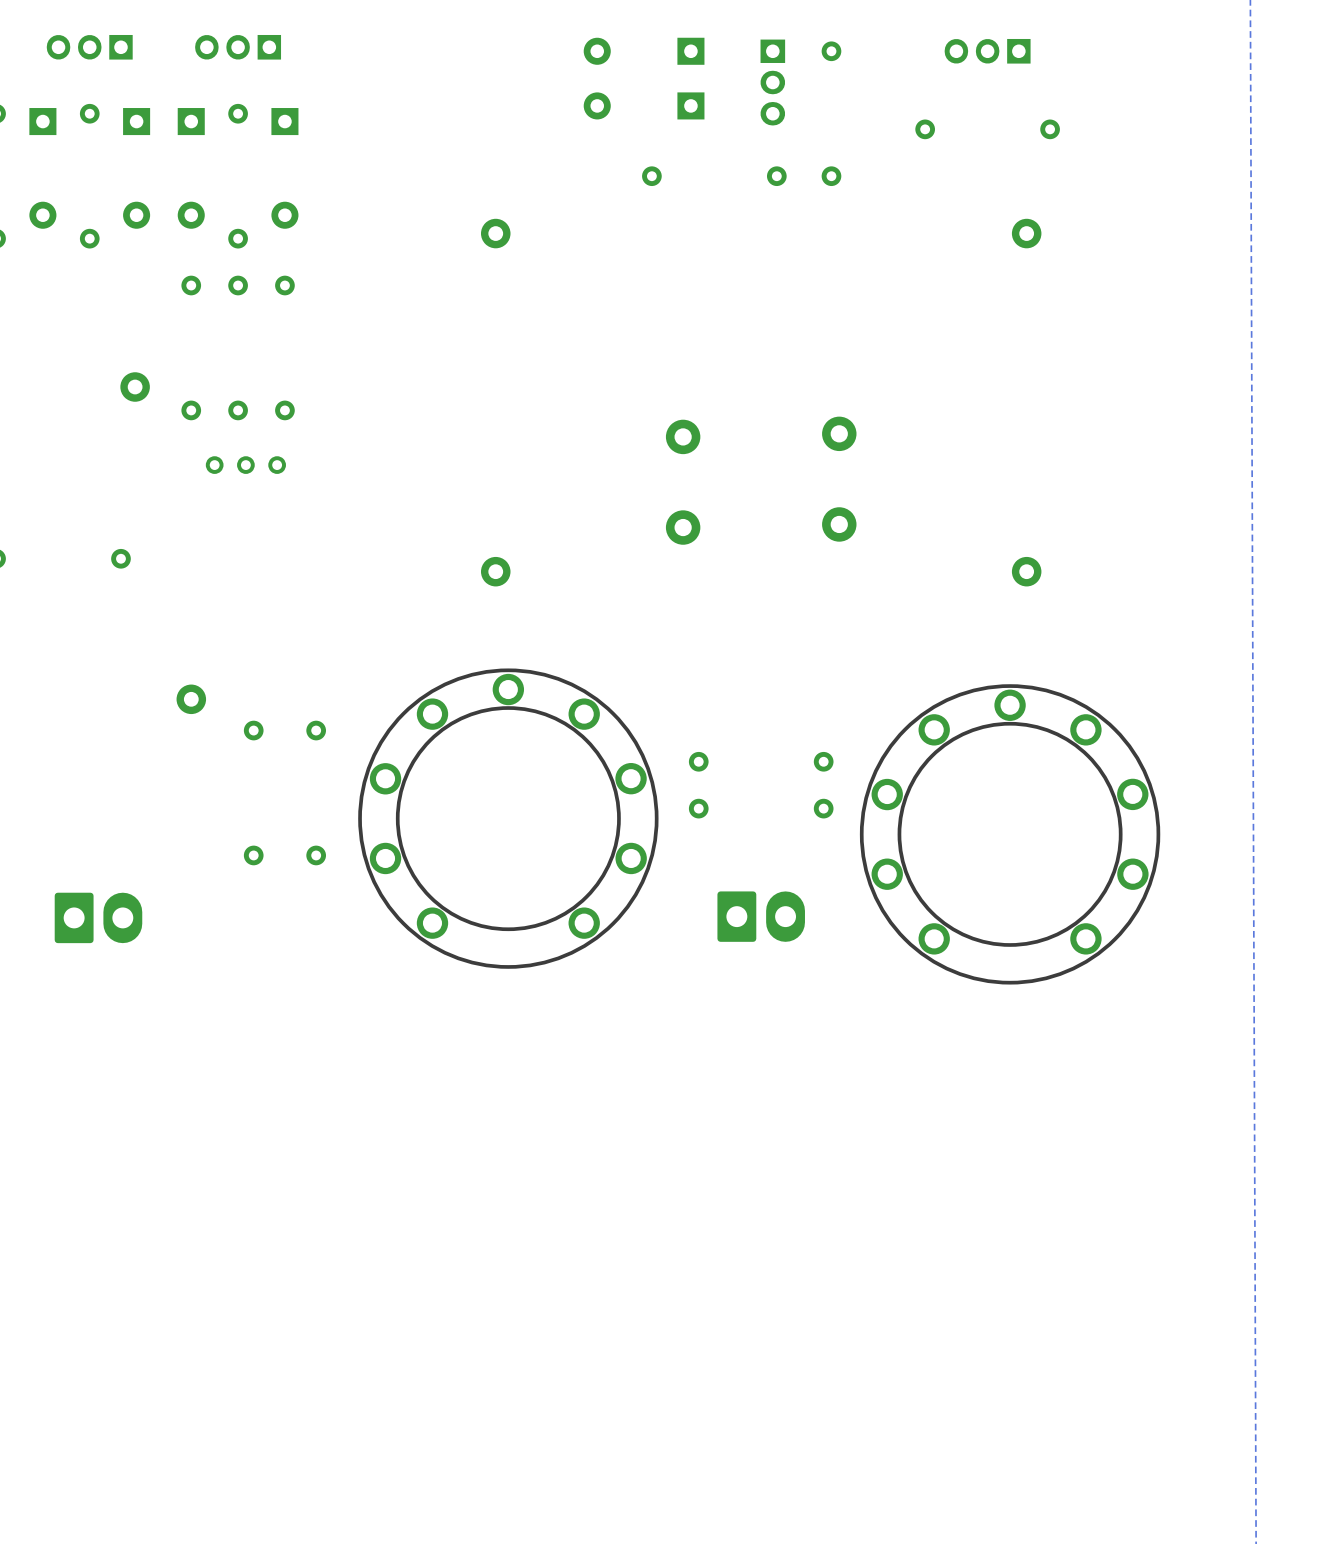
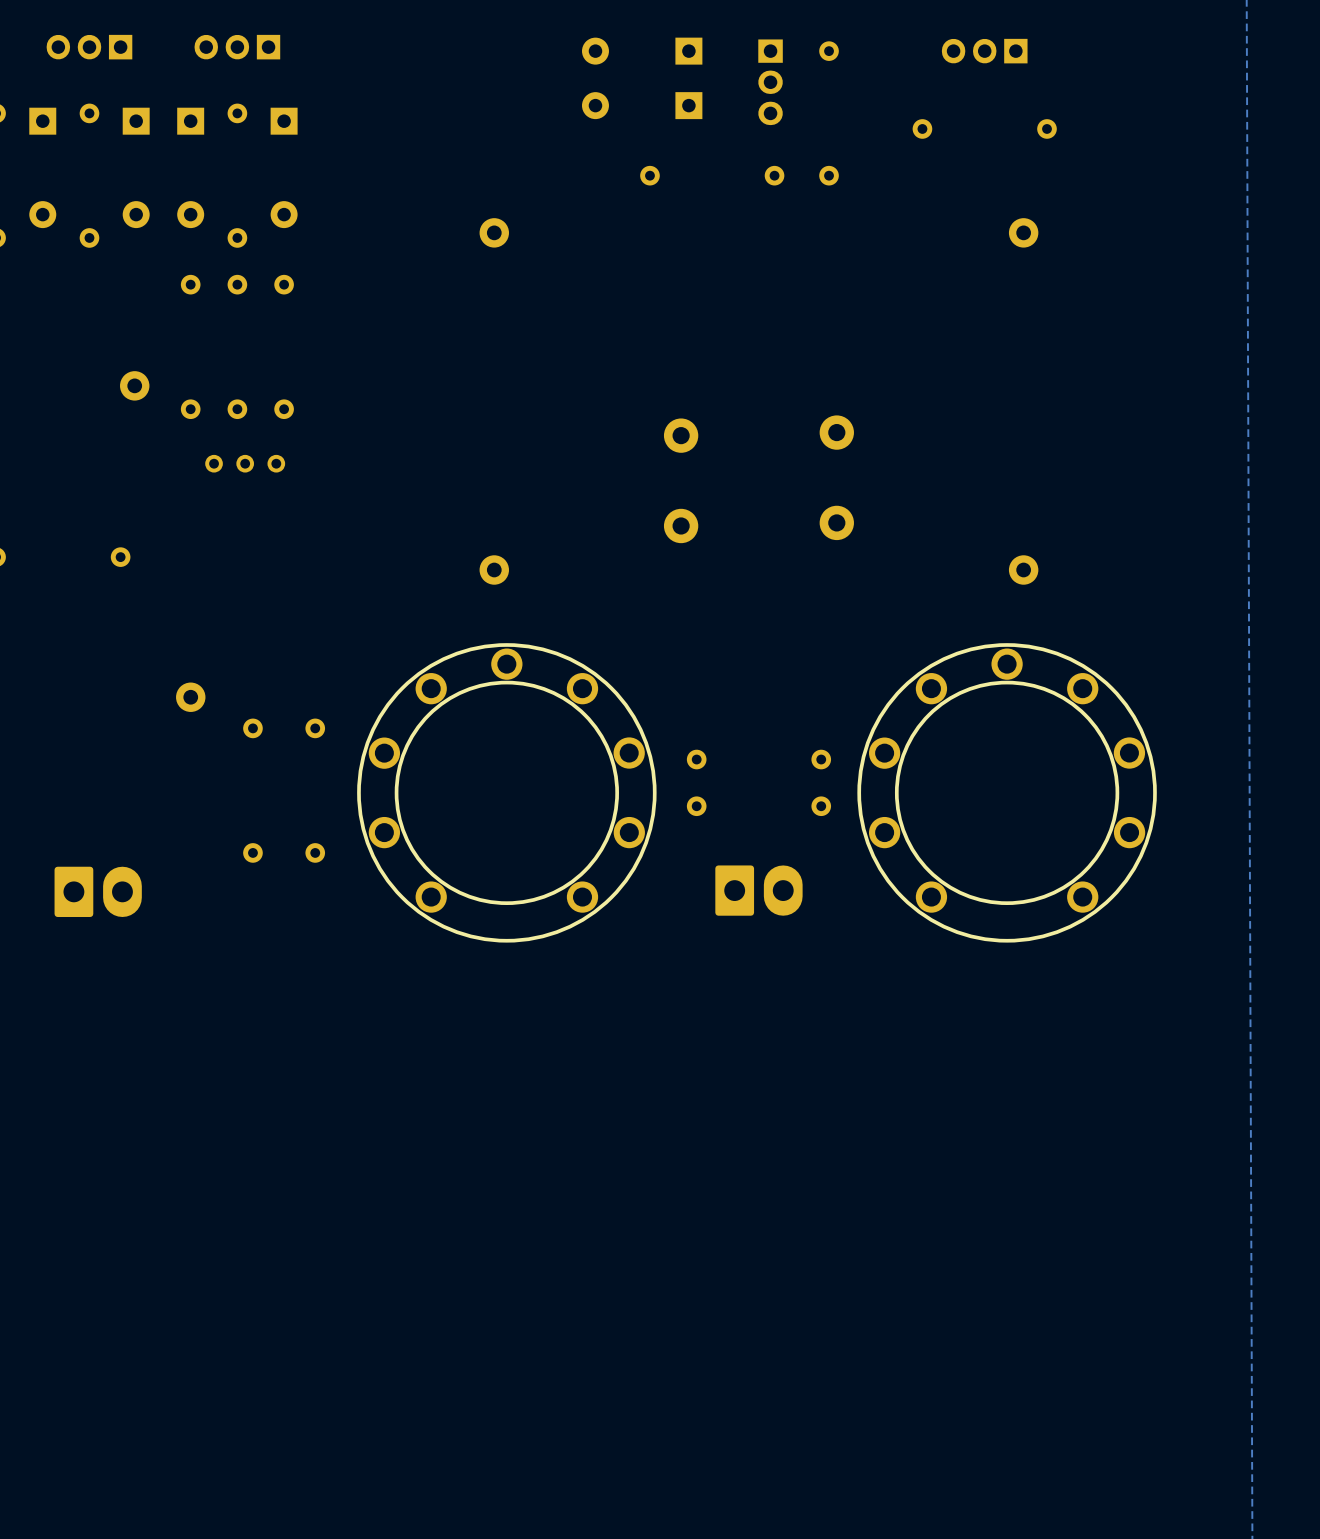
part position: (508, 818) -> (506, 792)
part position: (1010, 834) -> (1007, 792)
part position: (761, 916) -> (758, 890)
part position: (98, 917) -> (98, 891)

